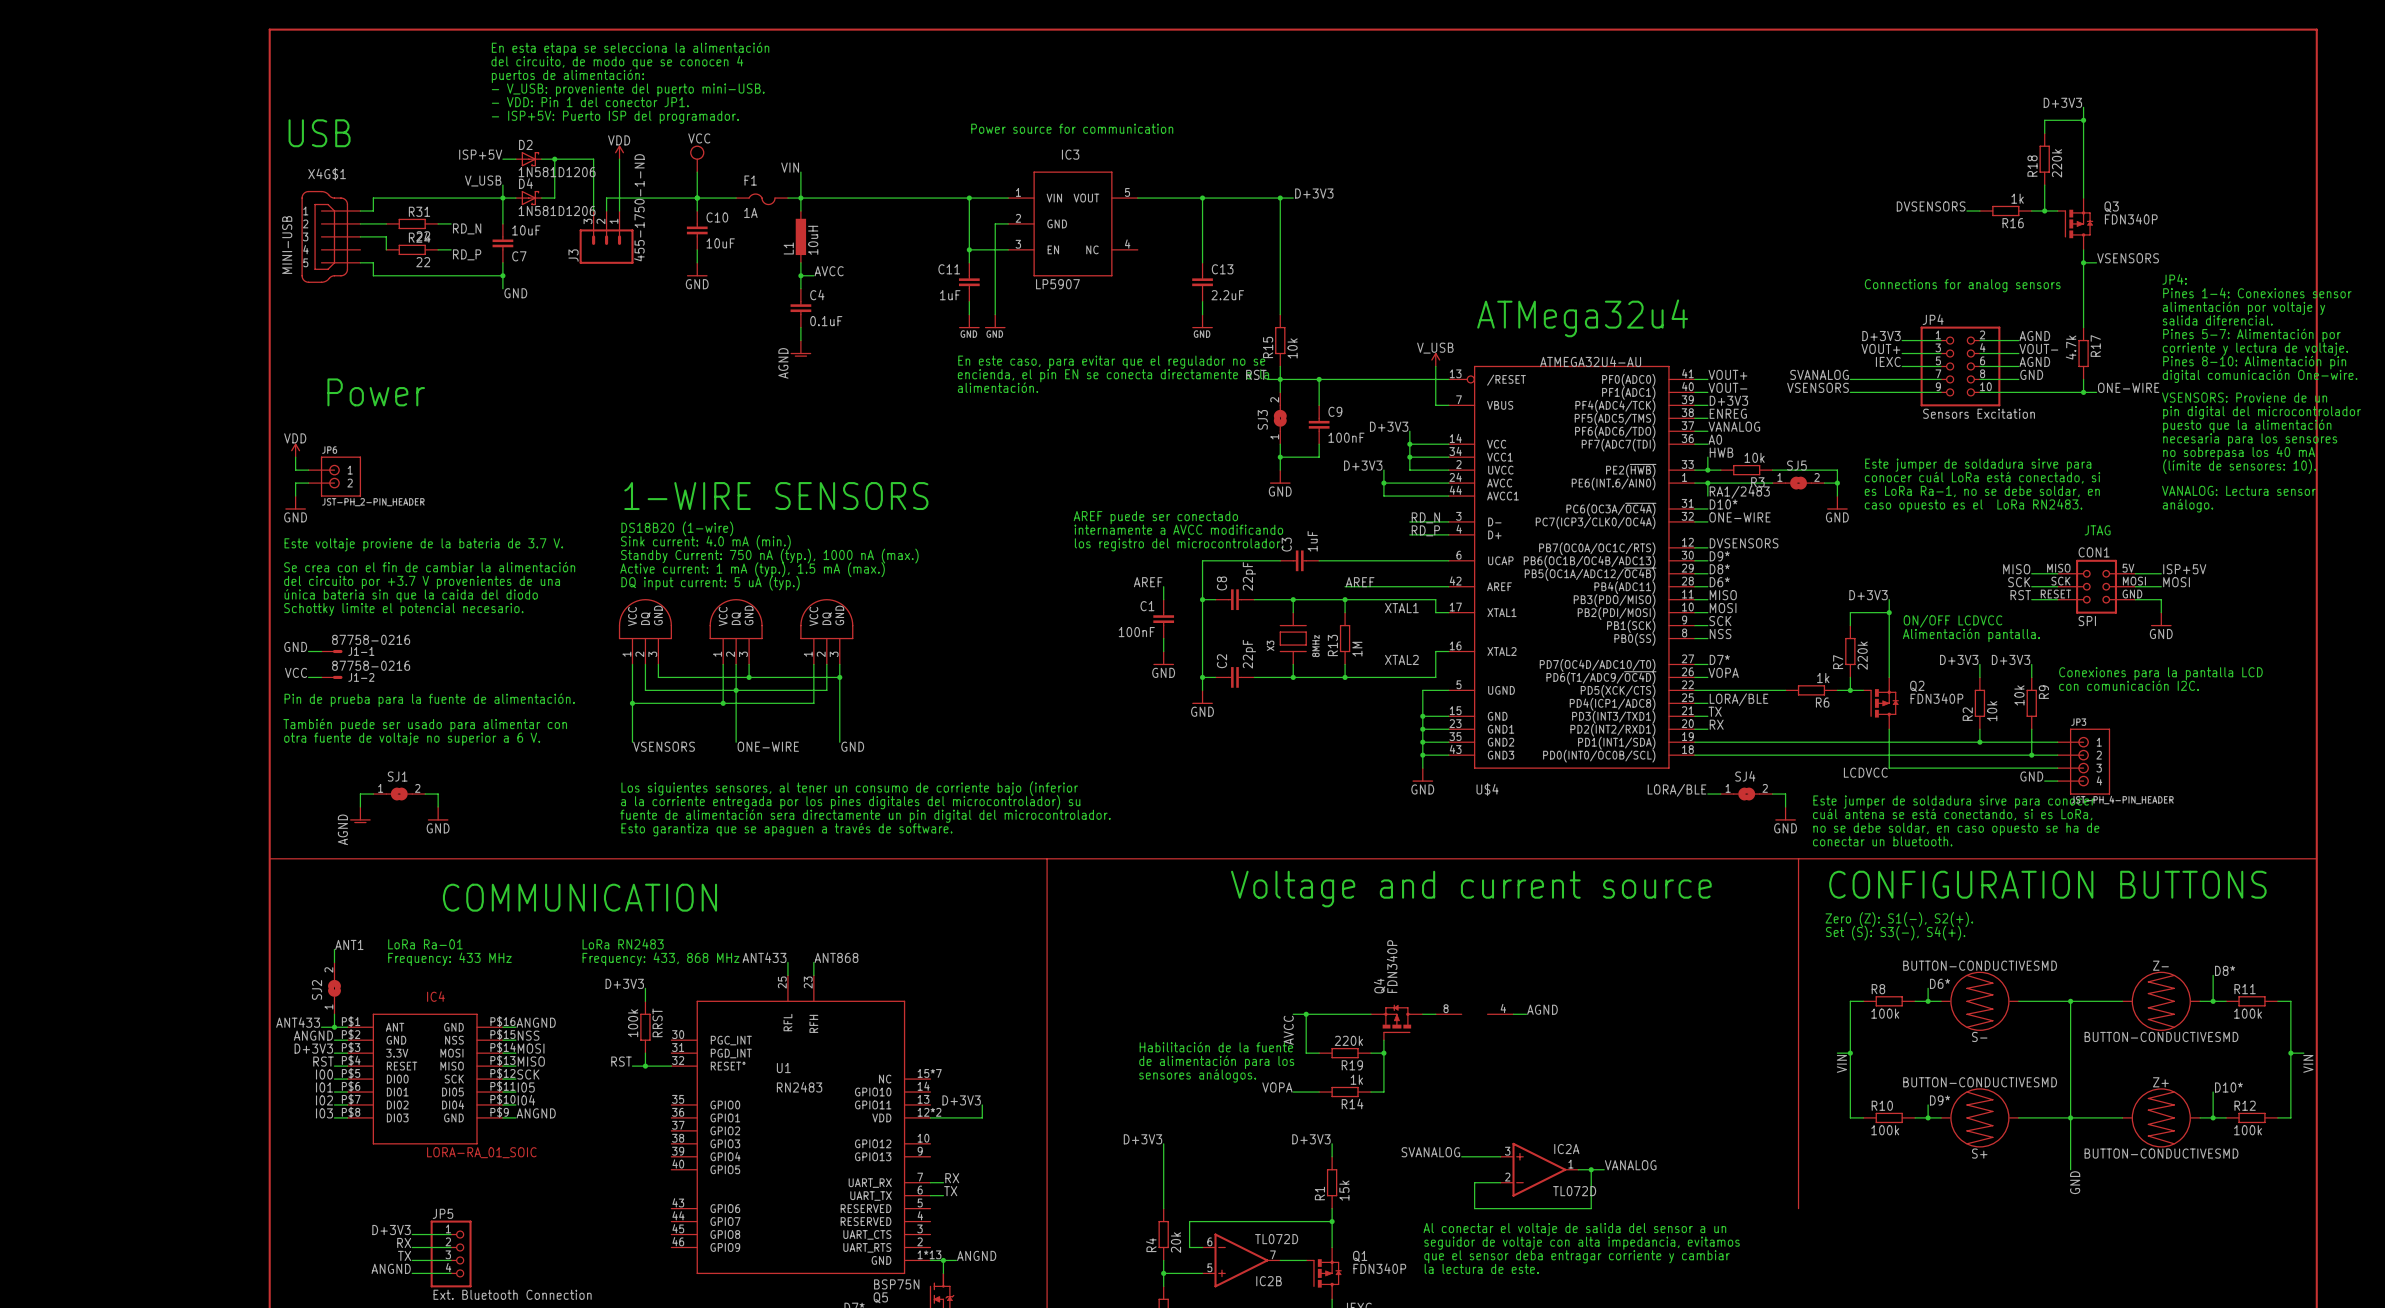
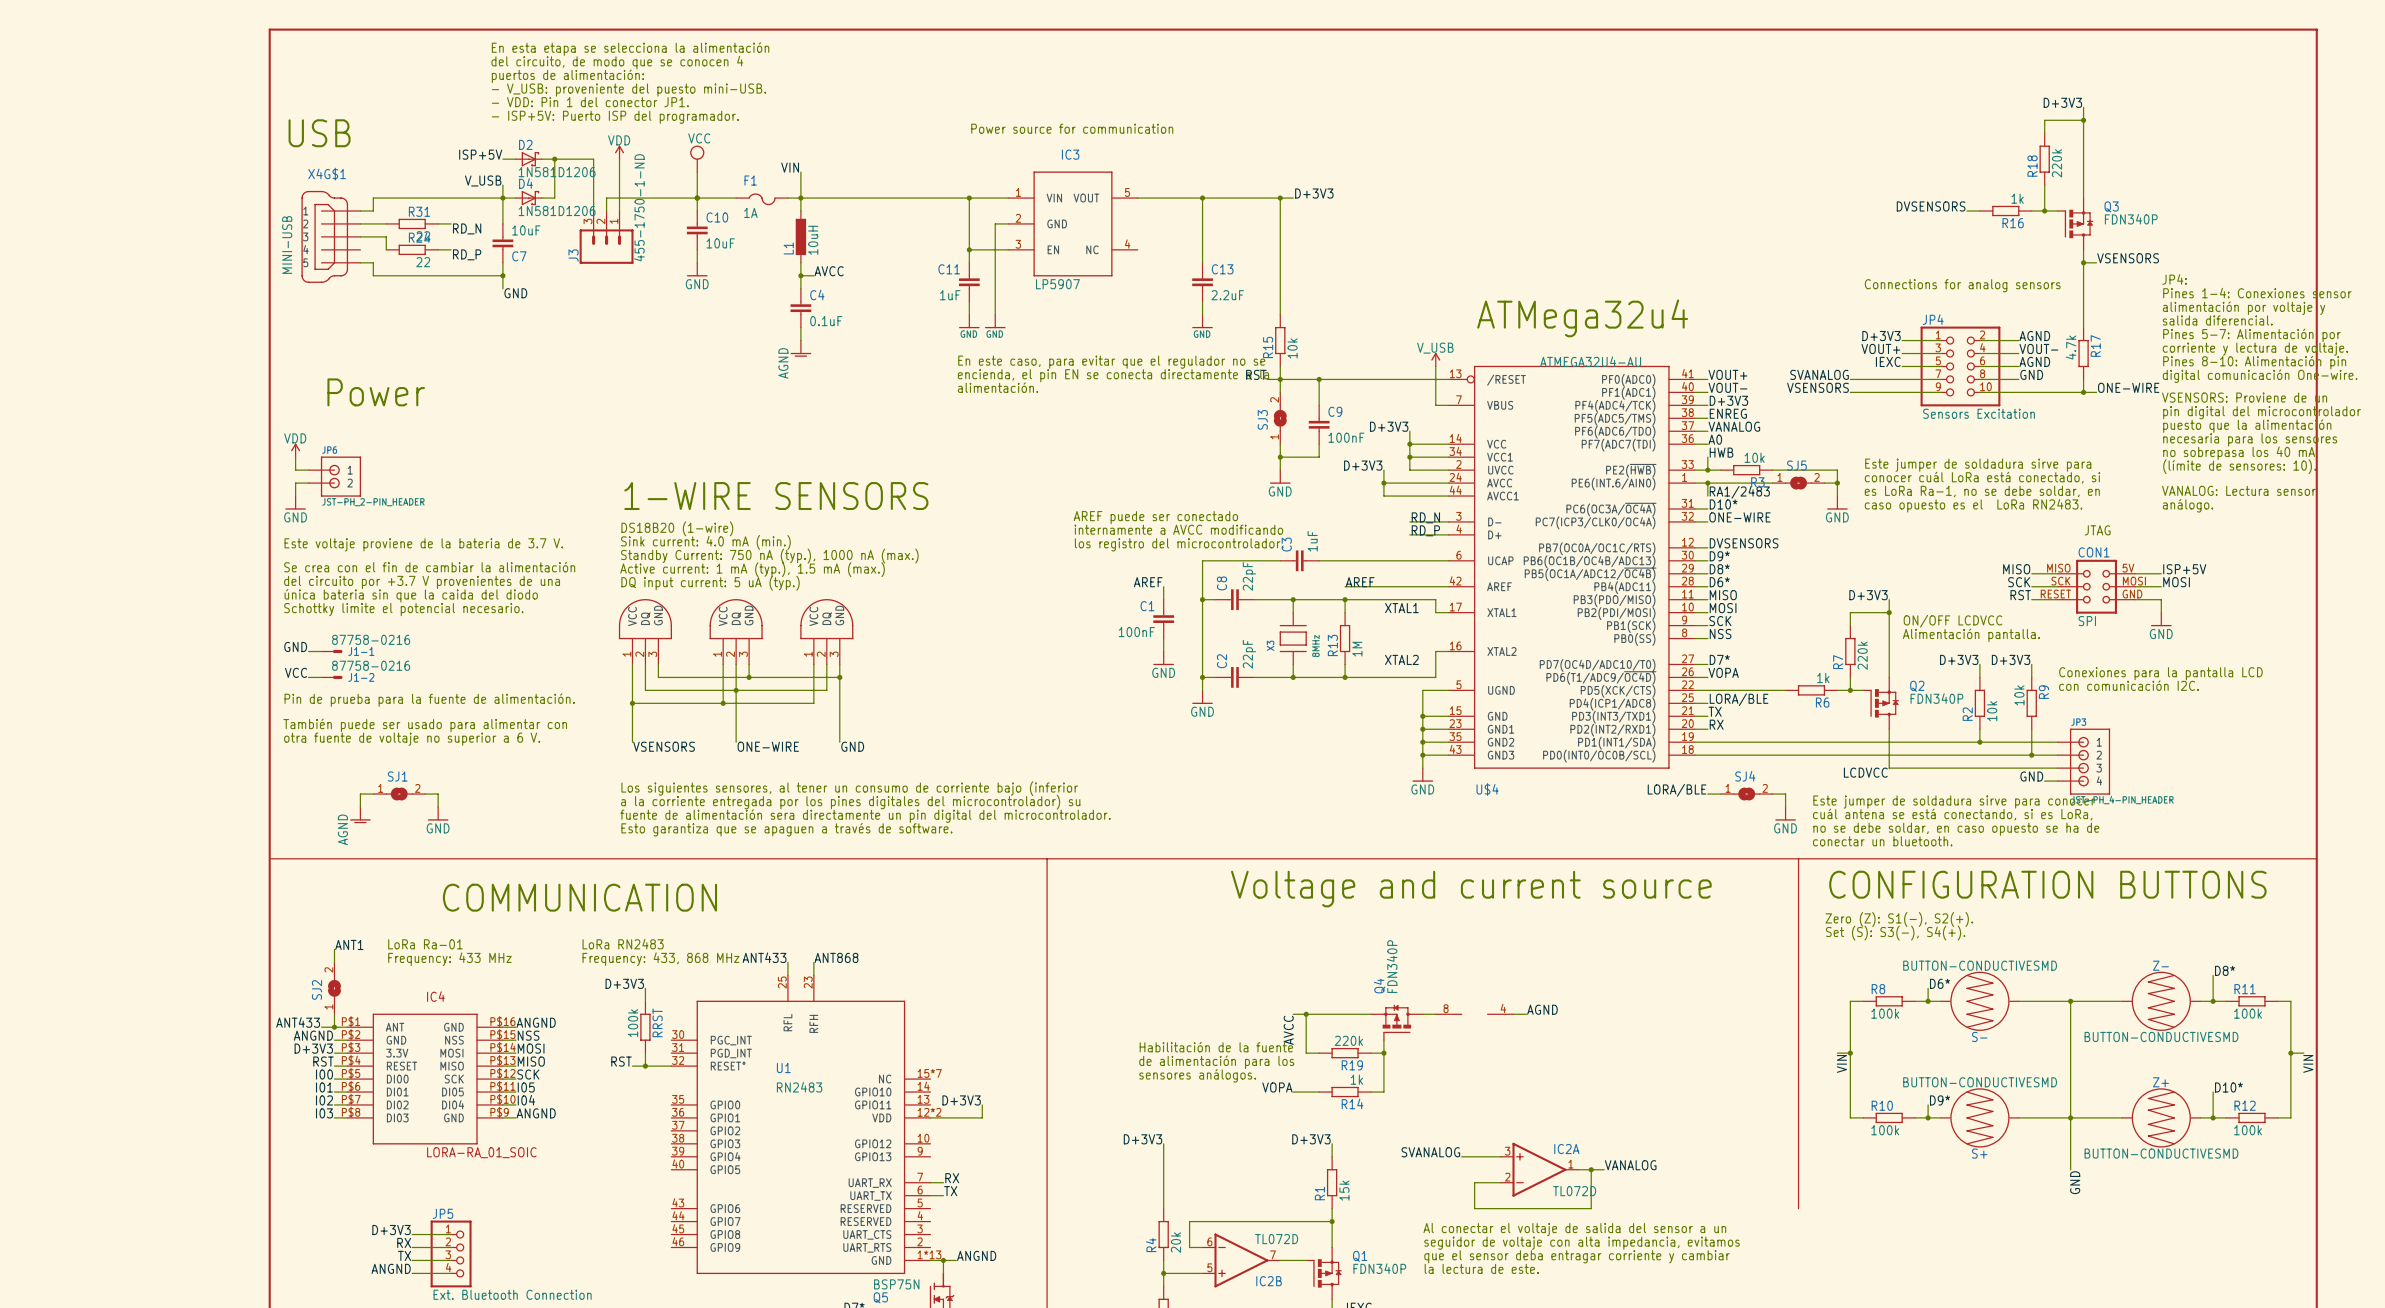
text: - V_USB: proveniente del puerto mini-USB. (628, 90) -> - V_USB: proveniente del puesto mini-USB. (629, 90)

